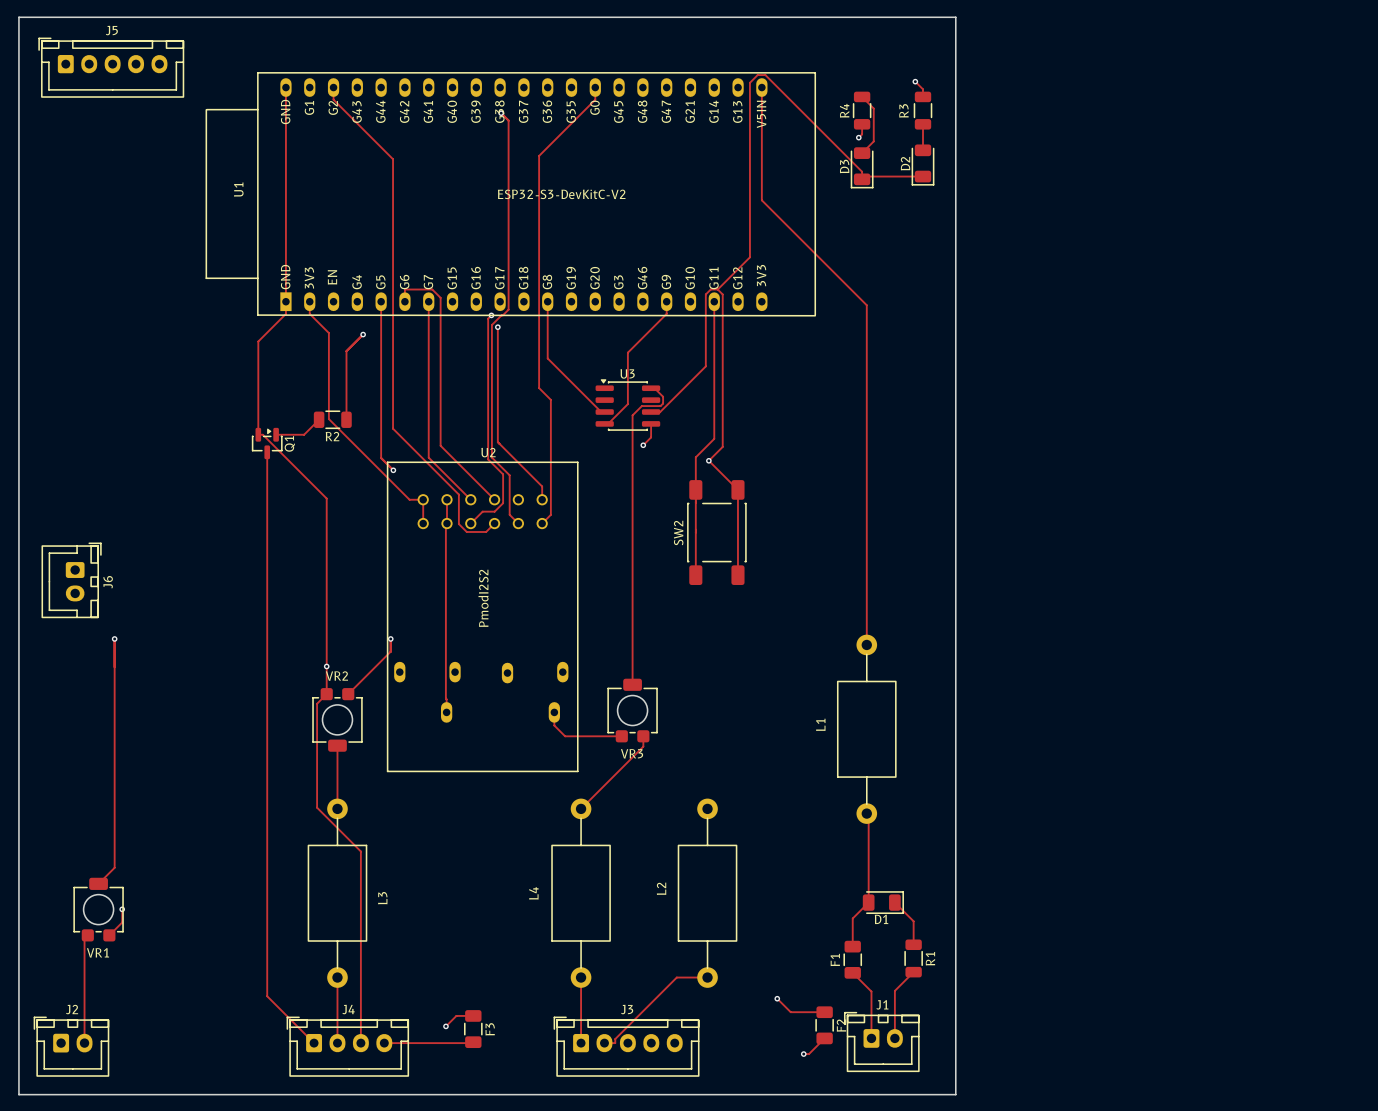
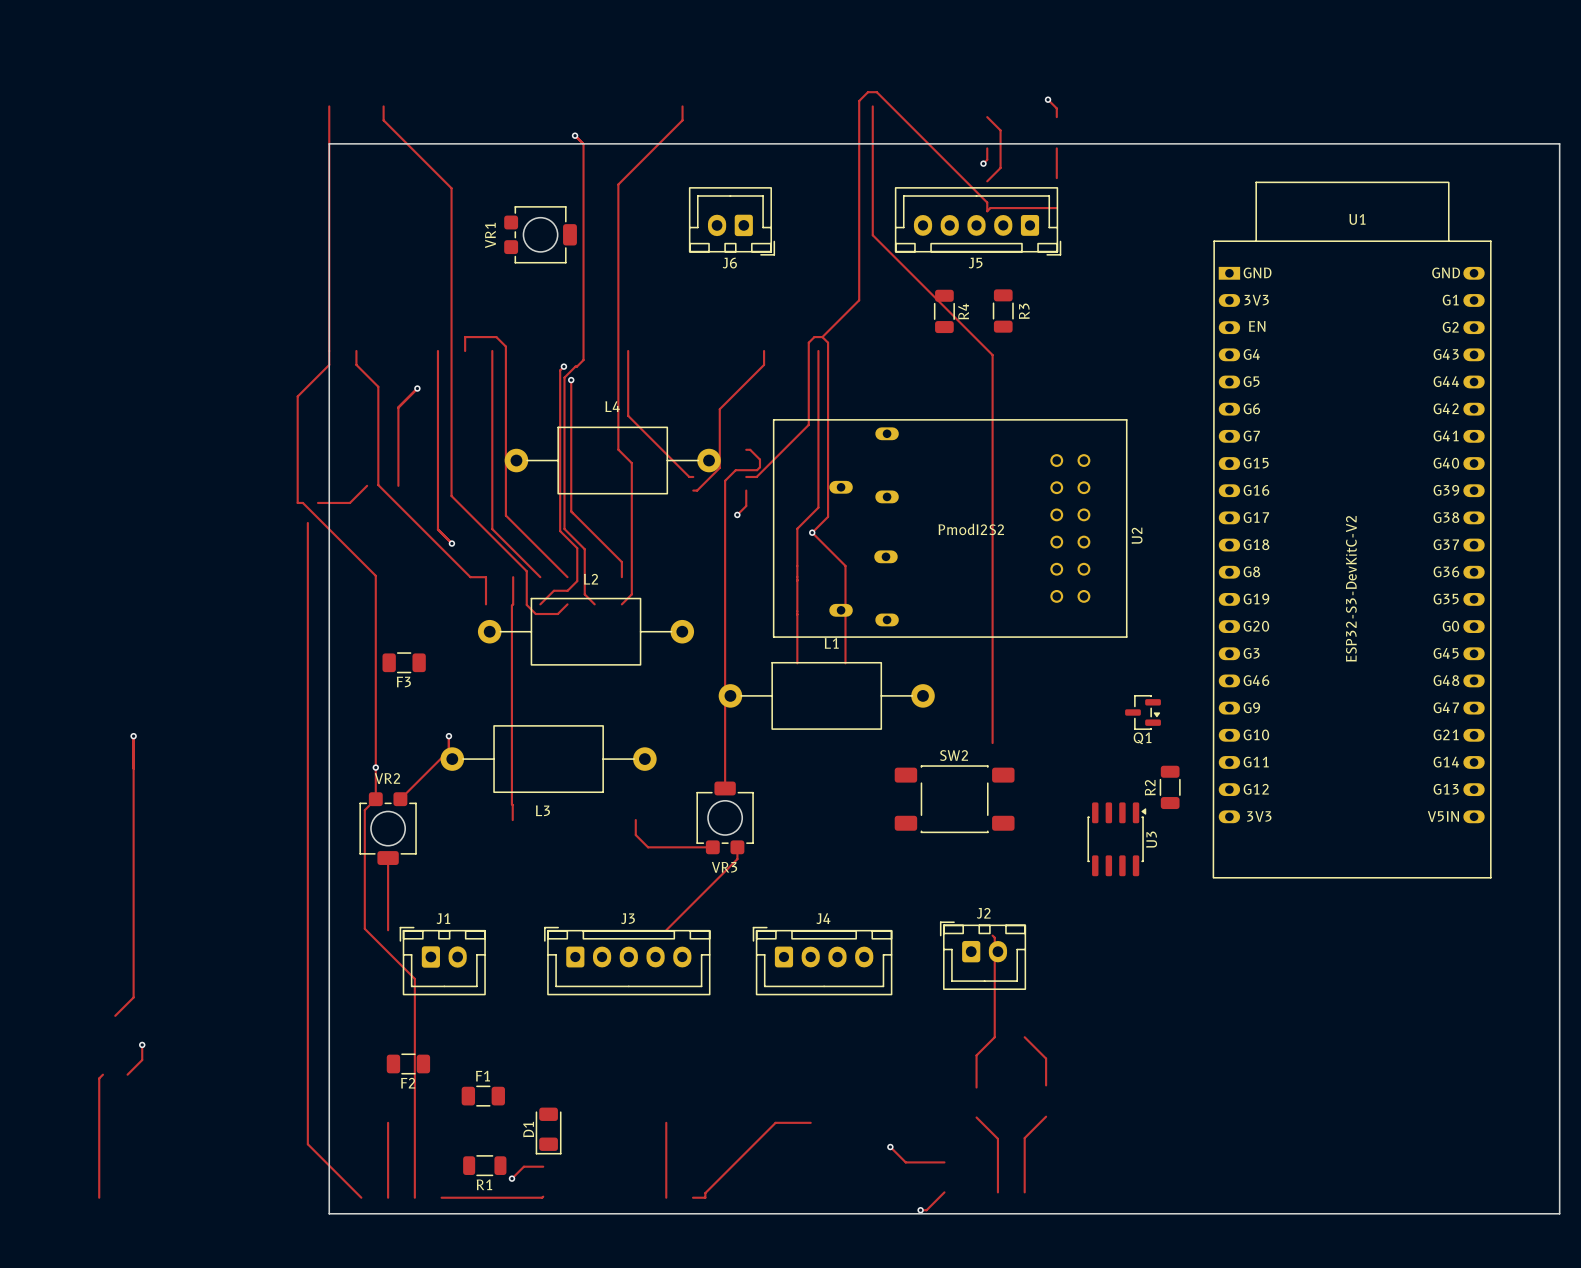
board edge: (18, 17) (955, 17) (955, 1094) (18, 1094) (18, 17) -> none
J5 rotation: 0° (111, 67) -> 180° (978, 221)
J5 position: (111, 67) -> (978, 221)
R4 name position: R4 (844, 110) -> R4 (963, 311)
R4 position: (862, 110) -> (944, 311)
R3 name position: R3 (903, 110) -> R3 (1024, 311)
R3 position: (923, 110) -> (1003, 311)
board edge: none -> (329, 143) (1559, 143) (1559, 1213) (329, 1213) (329, 143)
D2: (923, 164) -> none
D3: (862, 167) -> none
U1 rotation: 0° (510, 194) -> 90° clockwise (1352, 530)
U1 position: (510, 194) -> (1352, 530)
U3 rotation: 0° (627, 404) -> 90° clockwise (1116, 839)
U3 position: (627, 404) -> (1116, 839)
R2 rotation: 0° (332, 419) -> 90° clockwise (1170, 787)
R2 position: (332, 419) -> (1170, 787)
Q1 rotation: 0° (267, 443) -> 90° clockwise (1143, 712)
Q1 position: (267, 443) -> (1143, 712)
SW2 rotation: 0° (716, 532) -> 90° clockwise (954, 799)
SW2 position: (716, 532) -> (954, 799)
J6 rotation: 0° (71, 580) -> 90° clockwise (731, 221)
J6 position: (71, 580) -> (731, 221)
U2 rotation: 0° (482, 616) -> 90° clockwise (950, 528)
U2 position: (482, 616) -> (950, 528)
L1 rotation: 0° (866, 729) -> 90° clockwise (826, 695)
L1 position: (866, 729) -> (826, 695)
L3 rotation: 0° (337, 893) -> 90° clockwise (548, 759)
L3 position: (337, 893) -> (548, 759)
L4 rotation: 0° (581, 893) -> 90° clockwise (612, 460)
L4 position: (581, 893) -> (612, 460)
L2 rotation: 0° (707, 893) -> 90° clockwise (585, 631)
L2 position: (707, 893) -> (585, 631)
D1 rotation: 0° (883, 902) -> 90° clockwise (548, 1130)
D1 position: (883, 902) -> (548, 1130)
VR1 rotation: 0° (98, 909) -> 90° clockwise (540, 234)
VR1 position: (98, 909) -> (540, 234)
R1 rotation: 0° (913, 958) -> 90° clockwise (484, 1165)
R1 position: (913, 958) -> (484, 1165)
F1 rotation: 0° (852, 959) -> 90° clockwise (483, 1096)
F1 position: (852, 959) -> (483, 1096)
F2 rotation: 0° (824, 1025) -> 90° clockwise (408, 1063)
F2 position: (824, 1025) -> (408, 1063)
F3 rotation: 0° (473, 1029) -> 90° clockwise (404, 662)
F3 position: (473, 1029) -> (404, 662)
J1 position: (881, 1041) -> (442, 961)
J2 position: (71, 1046) -> (983, 955)
J4 position: (347, 1046) -> (822, 961)
J3 position: (626, 1046) -> (627, 961)

